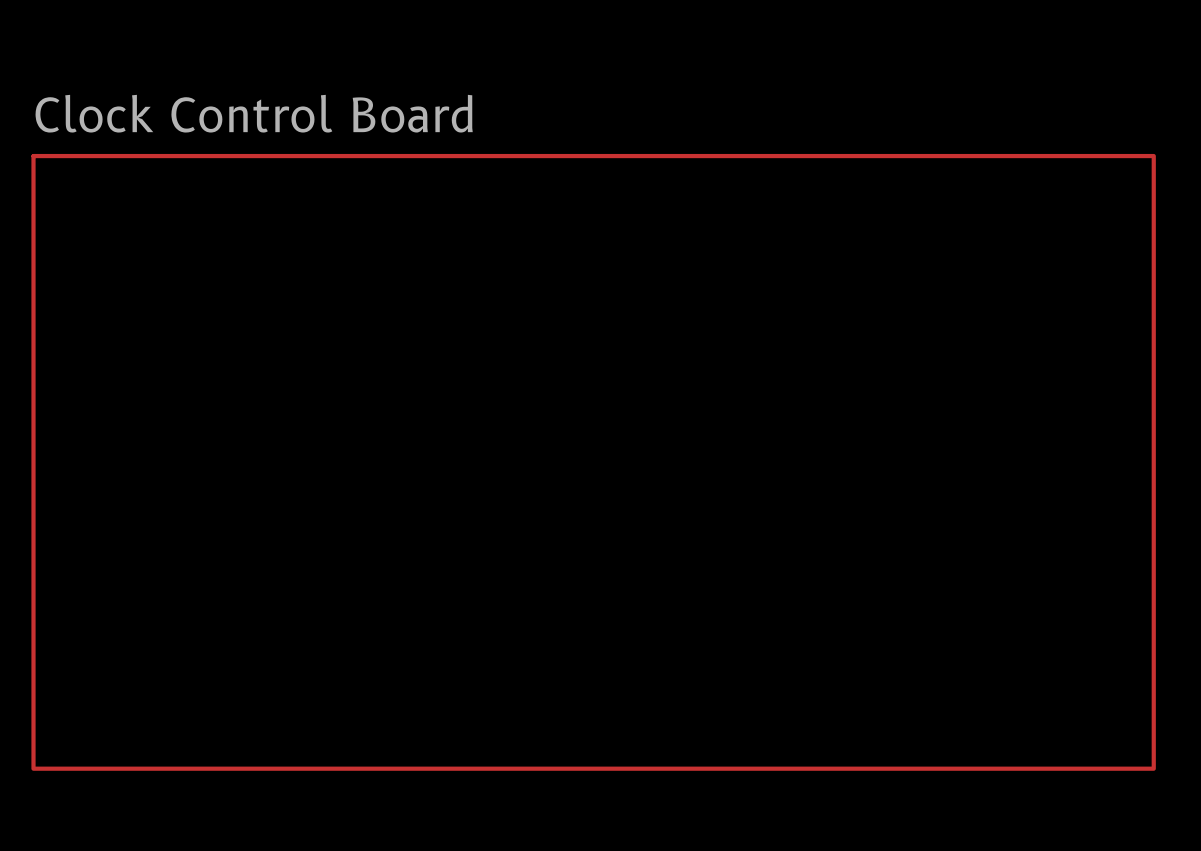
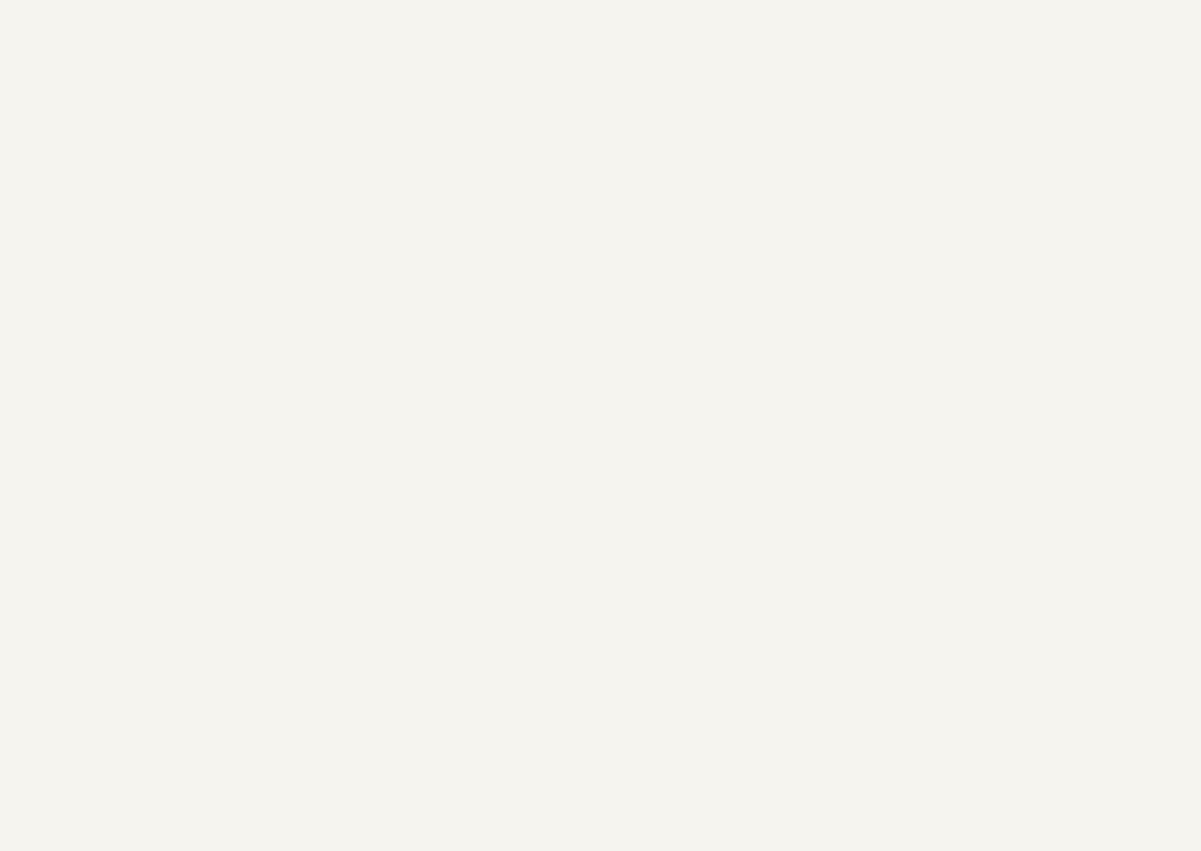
sheet Clock Control Board: (593, 462) -> none

